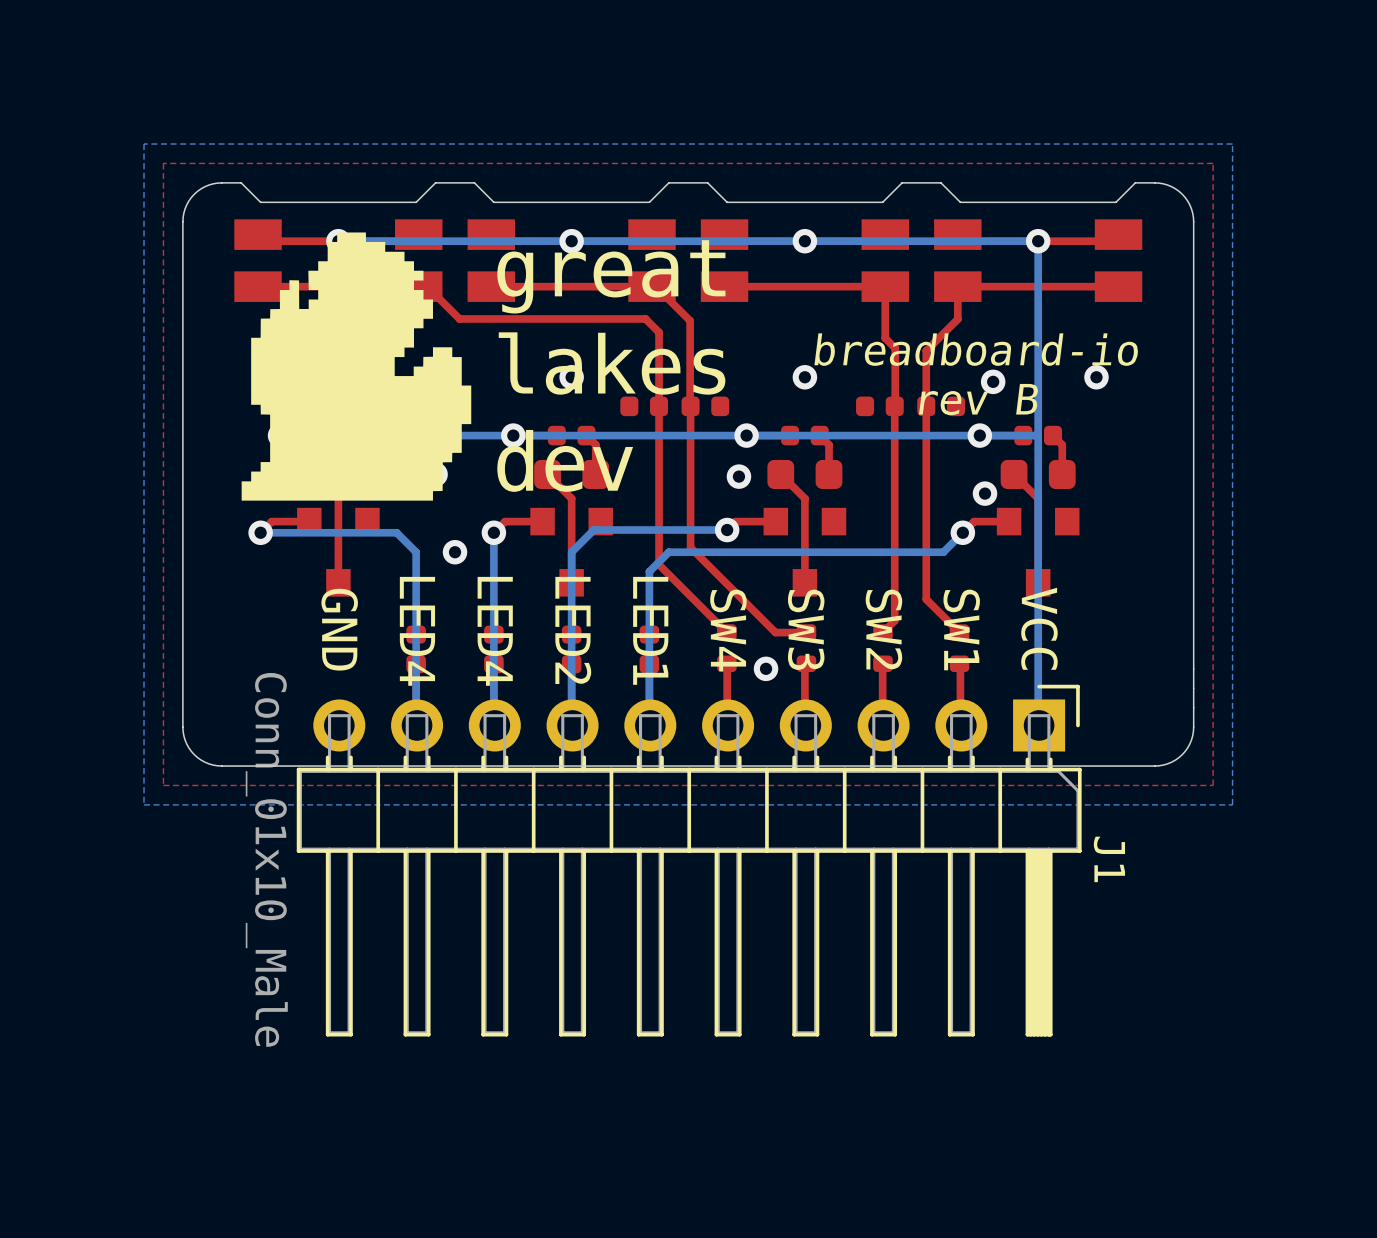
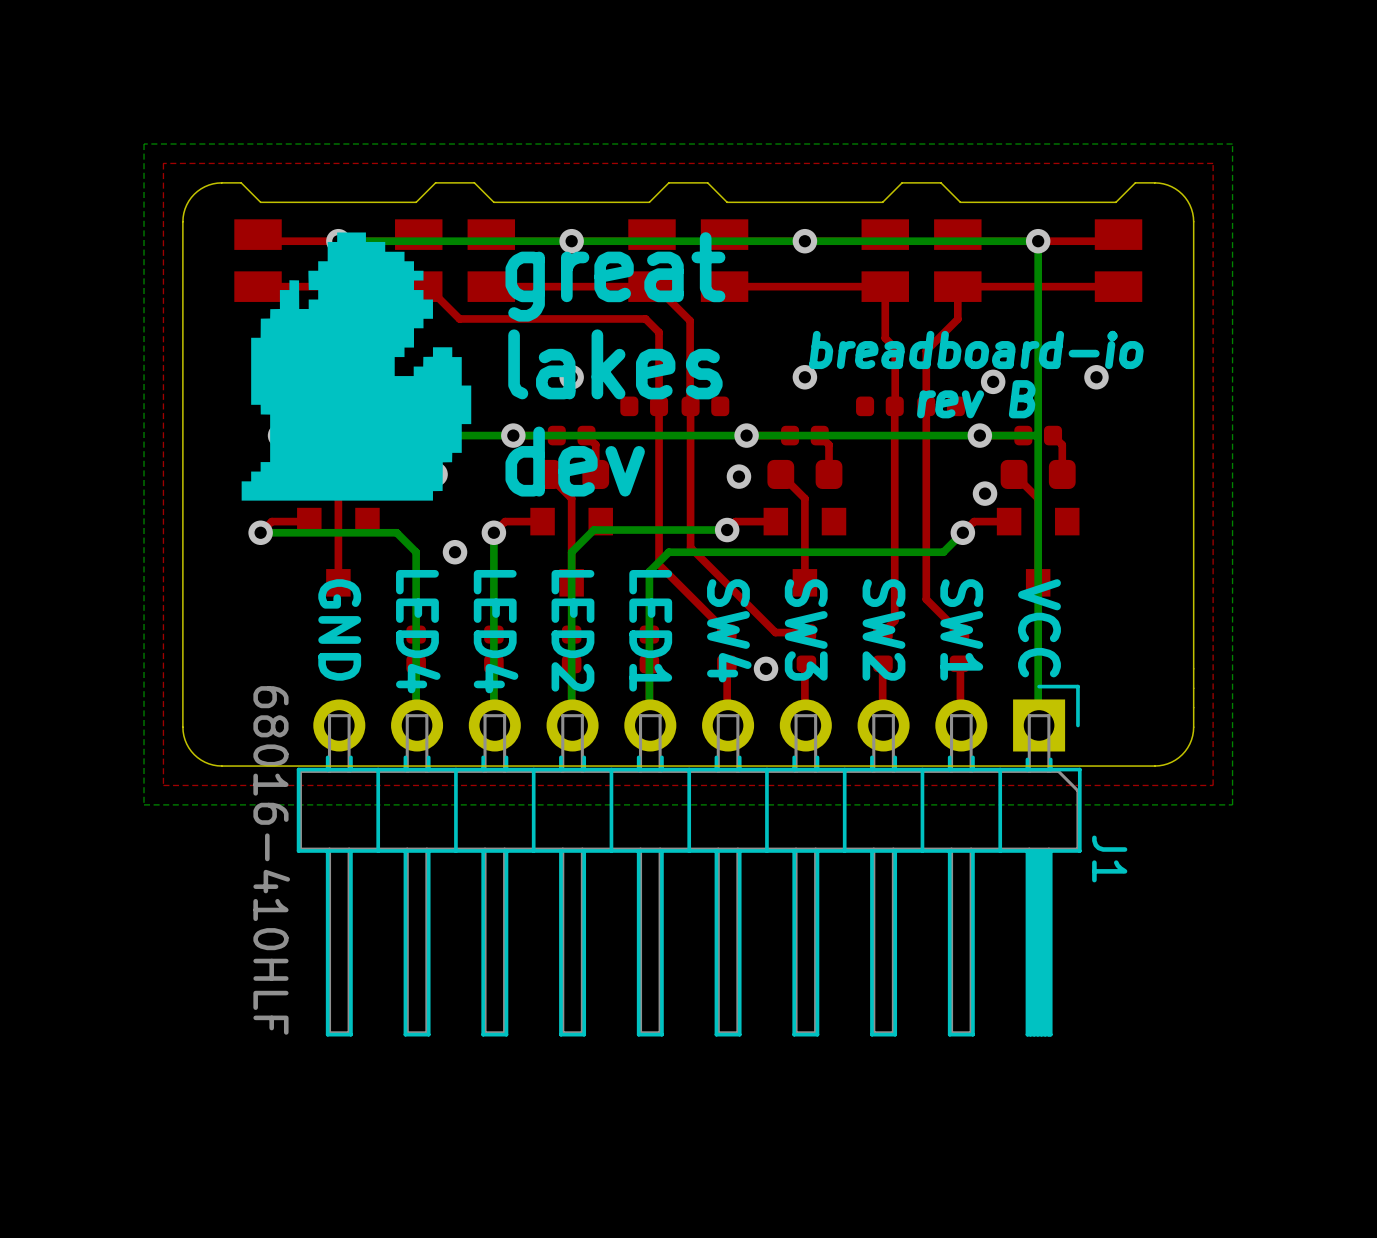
J1 value: Conn_01x10_Male (266, 859) -> 68016-410HLF (271, 860)

